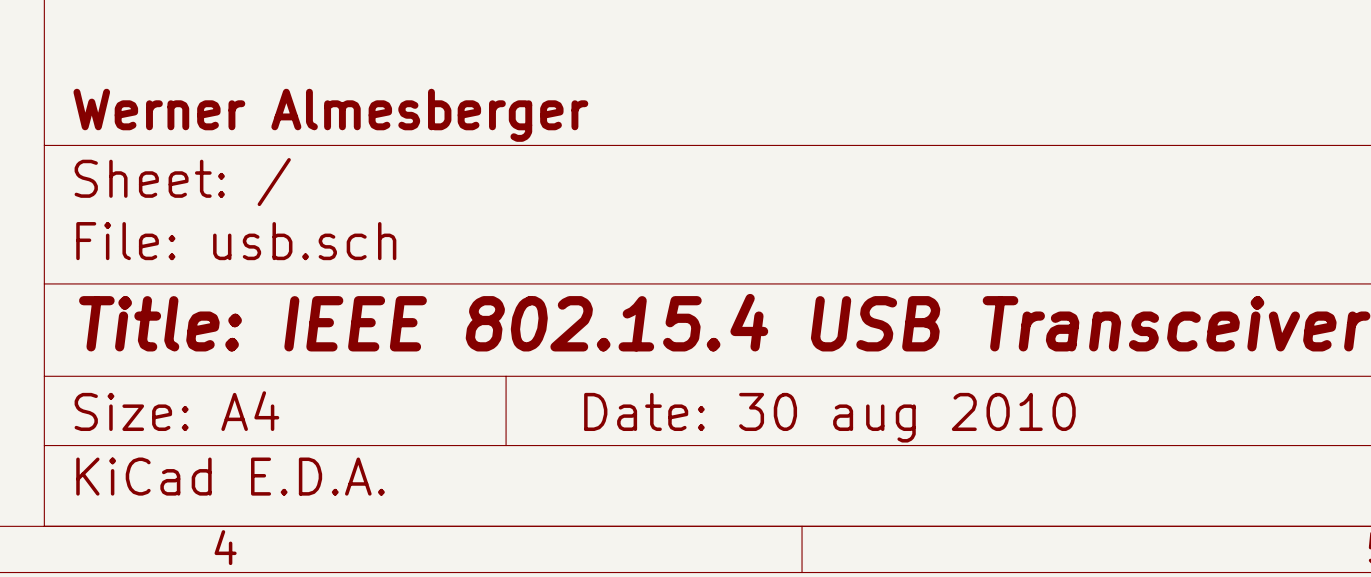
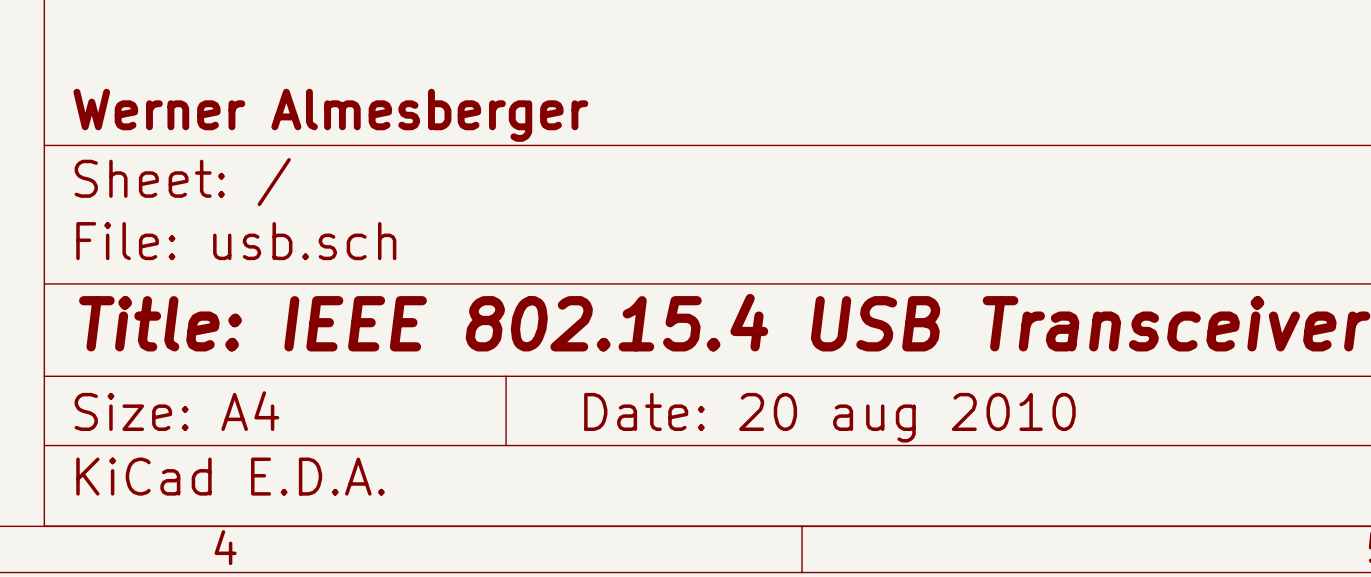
title block: Date: 30 aug 2010 (829, 417) -> Date: 20 aug 2010 (829, 417)

